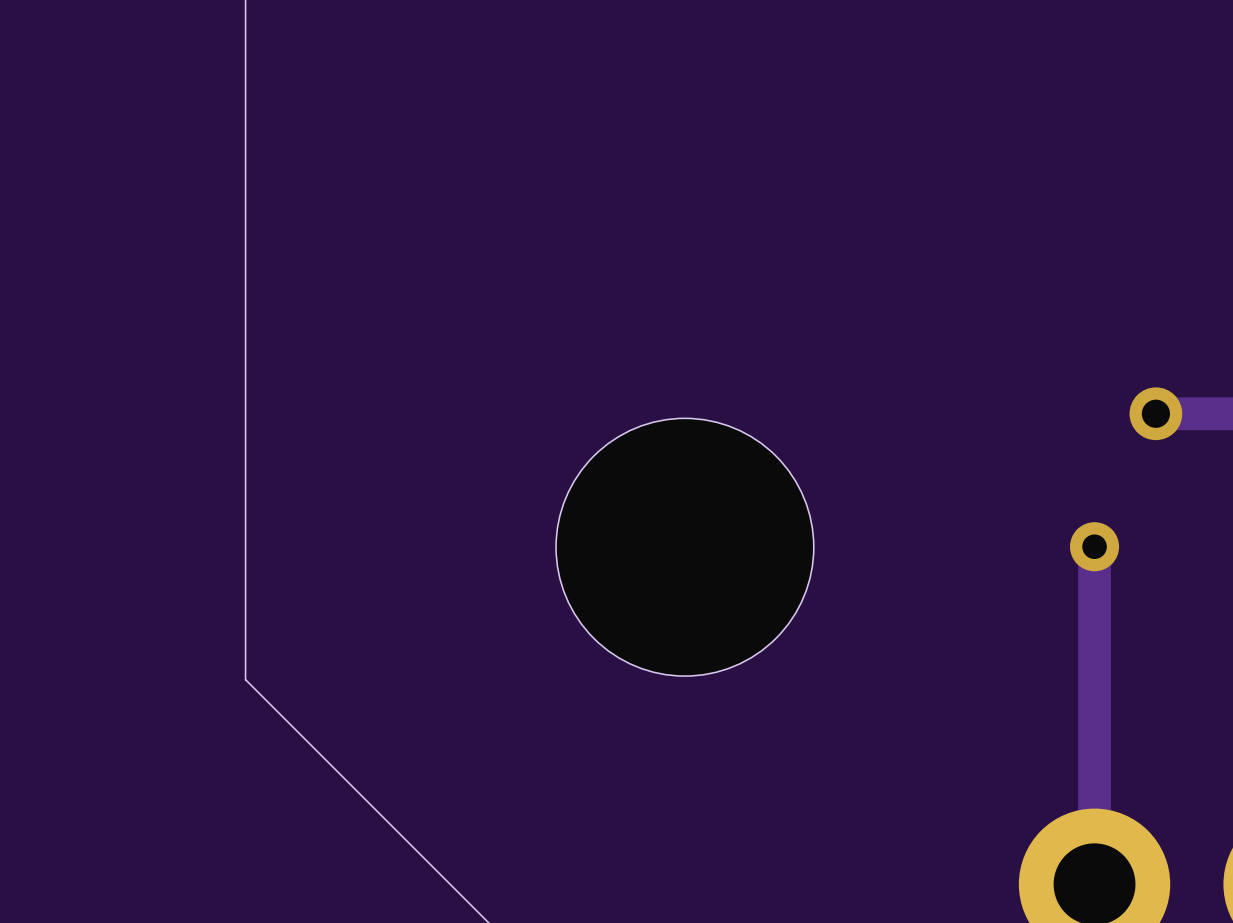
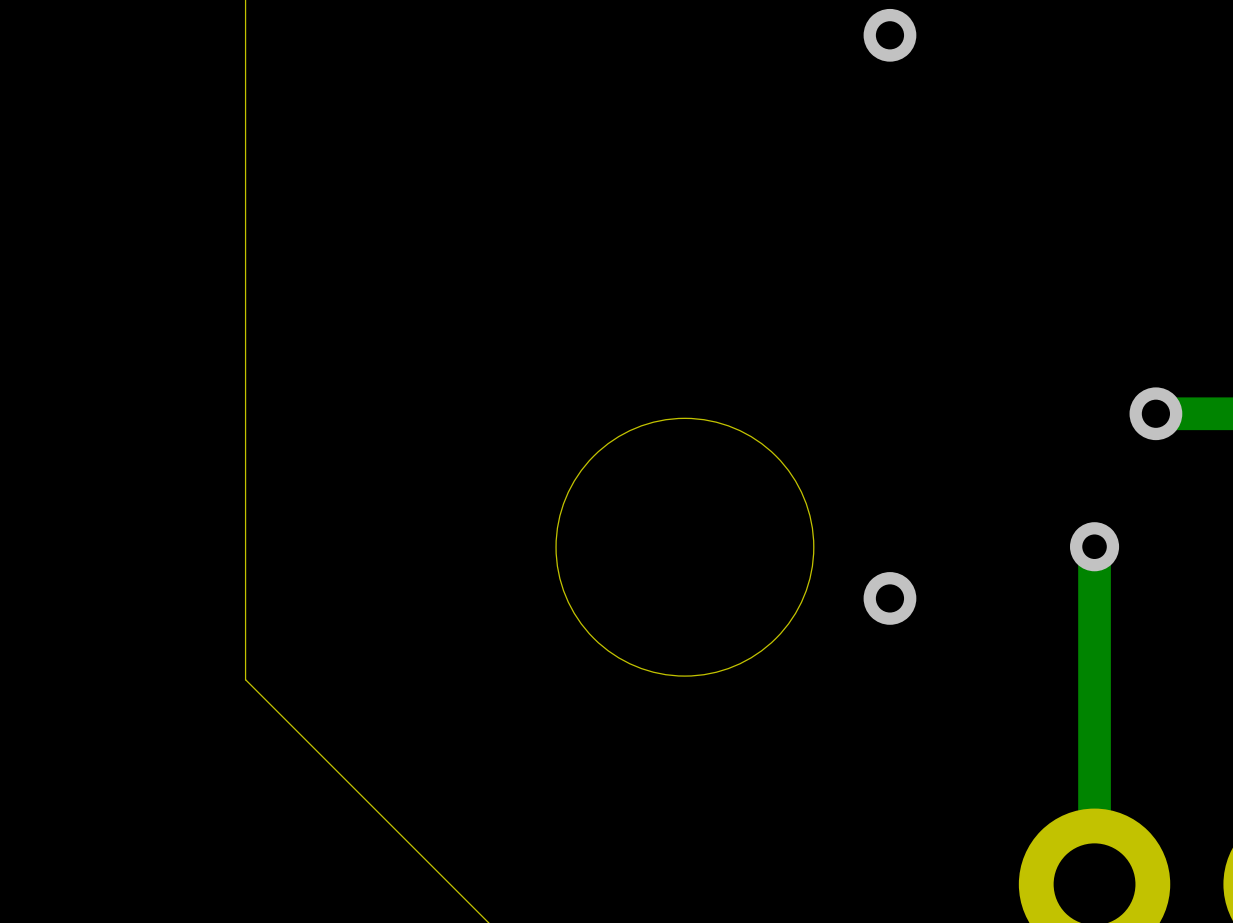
via: none -> (889, 35)
via: none -> (889, 598)

